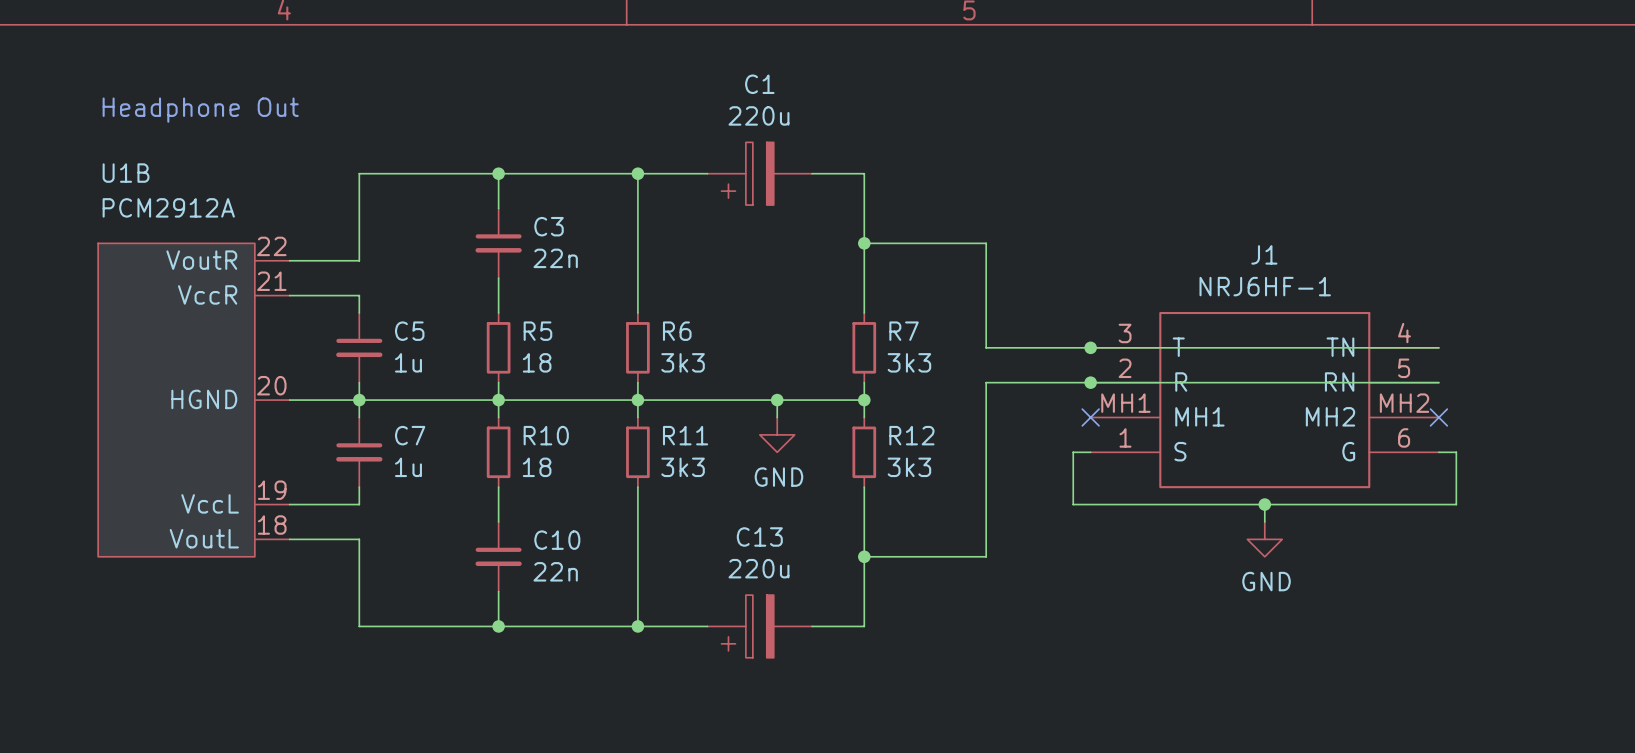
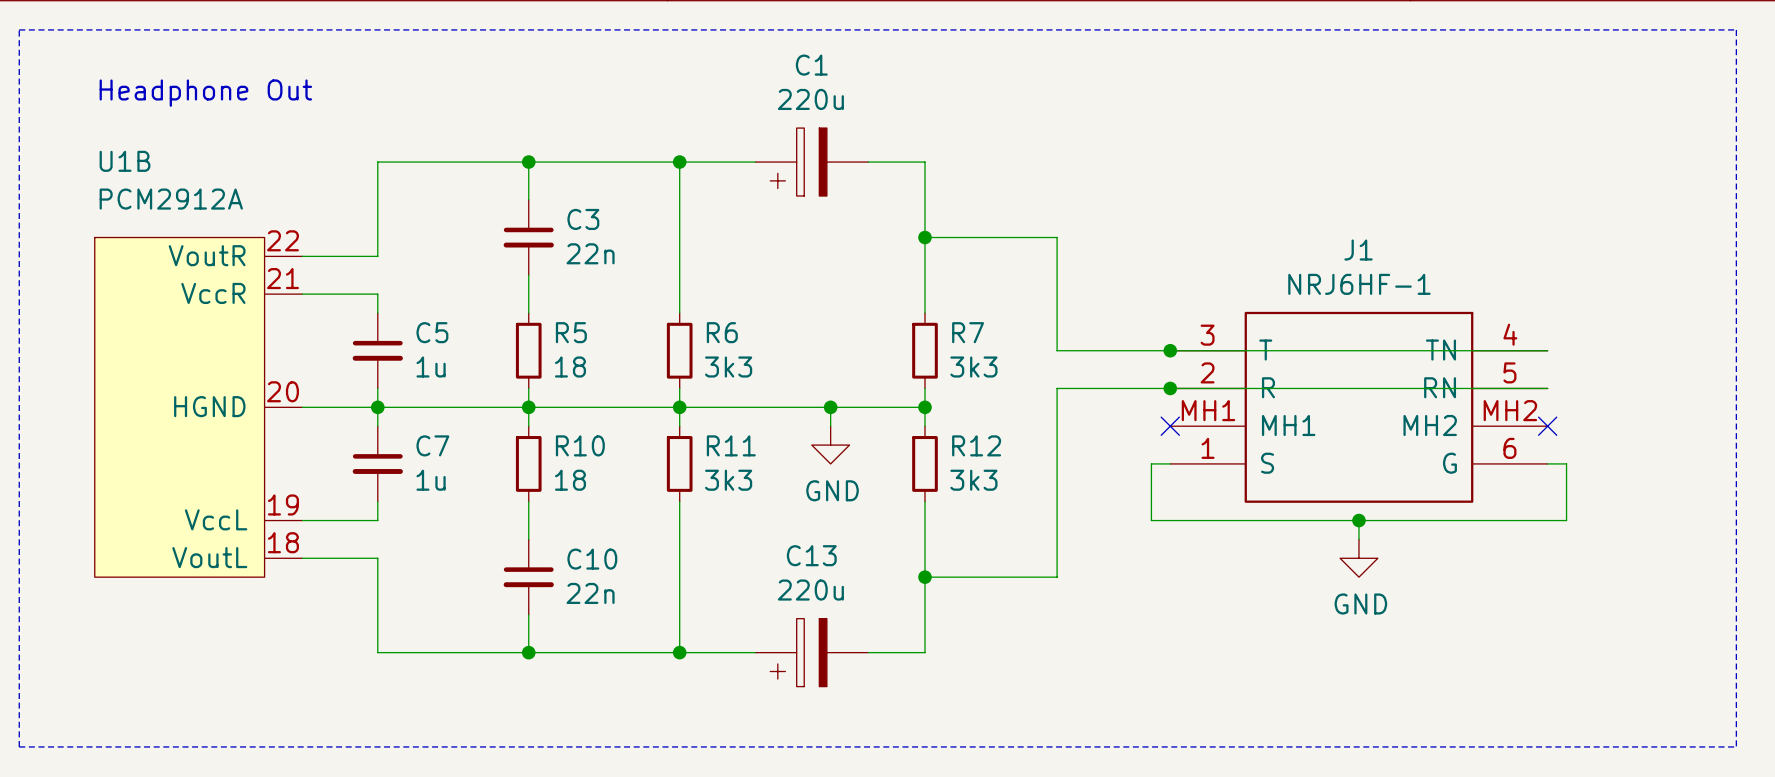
line: none -> (19, 29) (19, 746) (1736, 746) (1736, 29) (19, 29)

